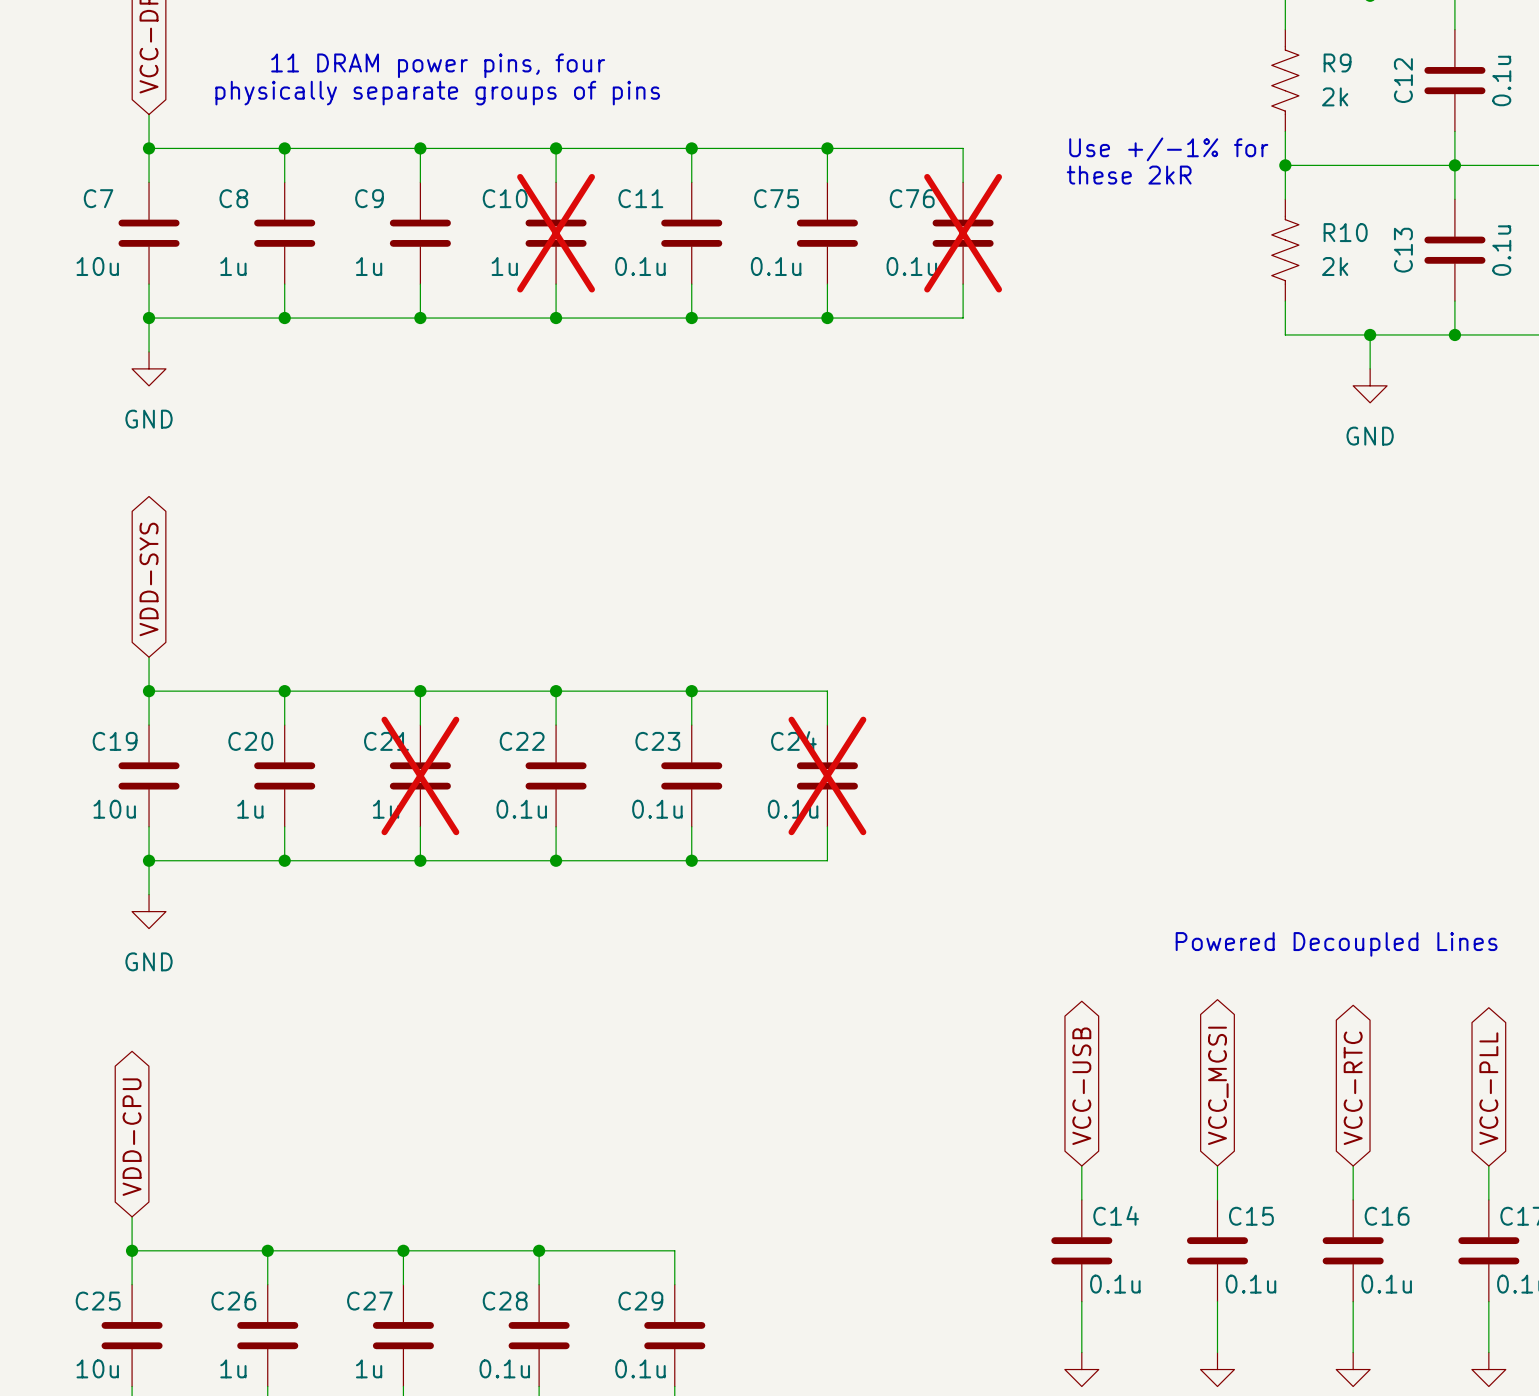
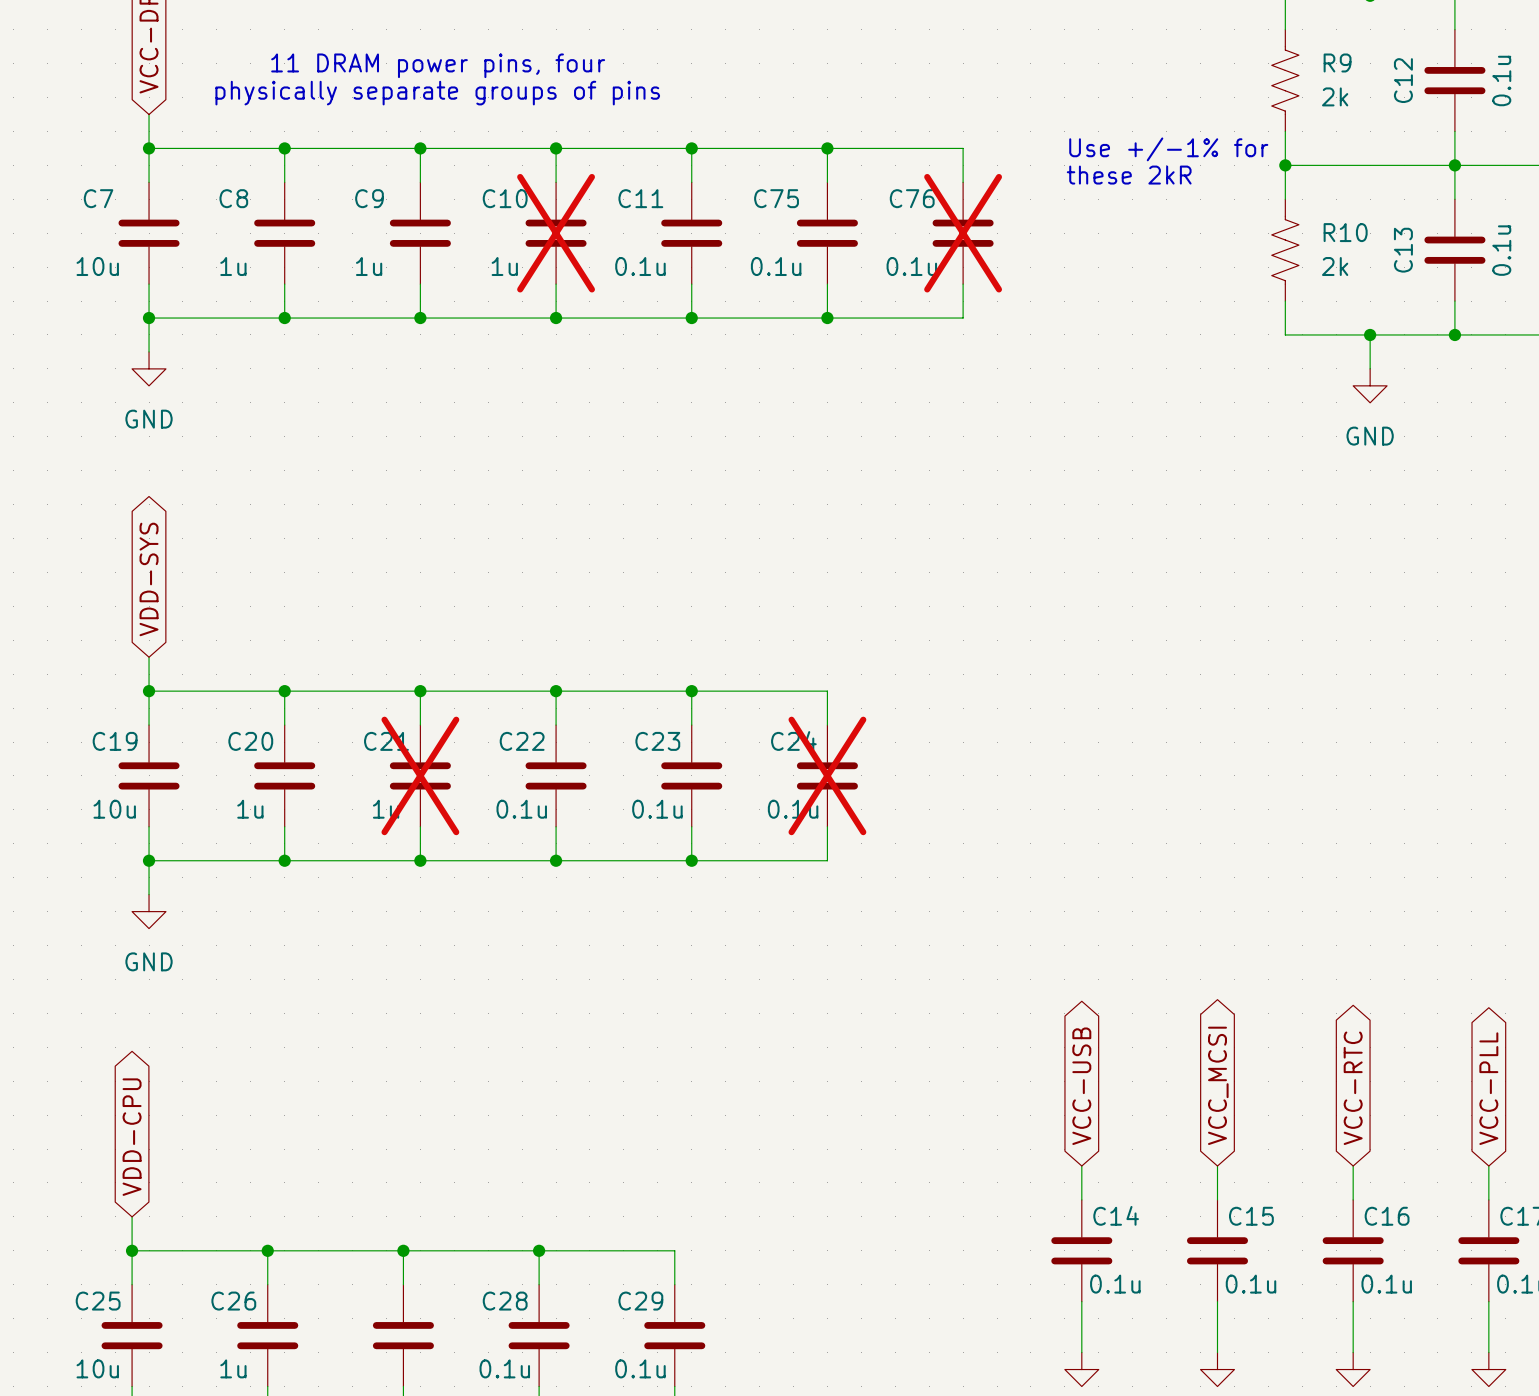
text: Powered Decoupled Lines (1336, 944) -> none
C27 name: C27 (369, 1301) -> none
C27 value: 1u (369, 1368) -> none

